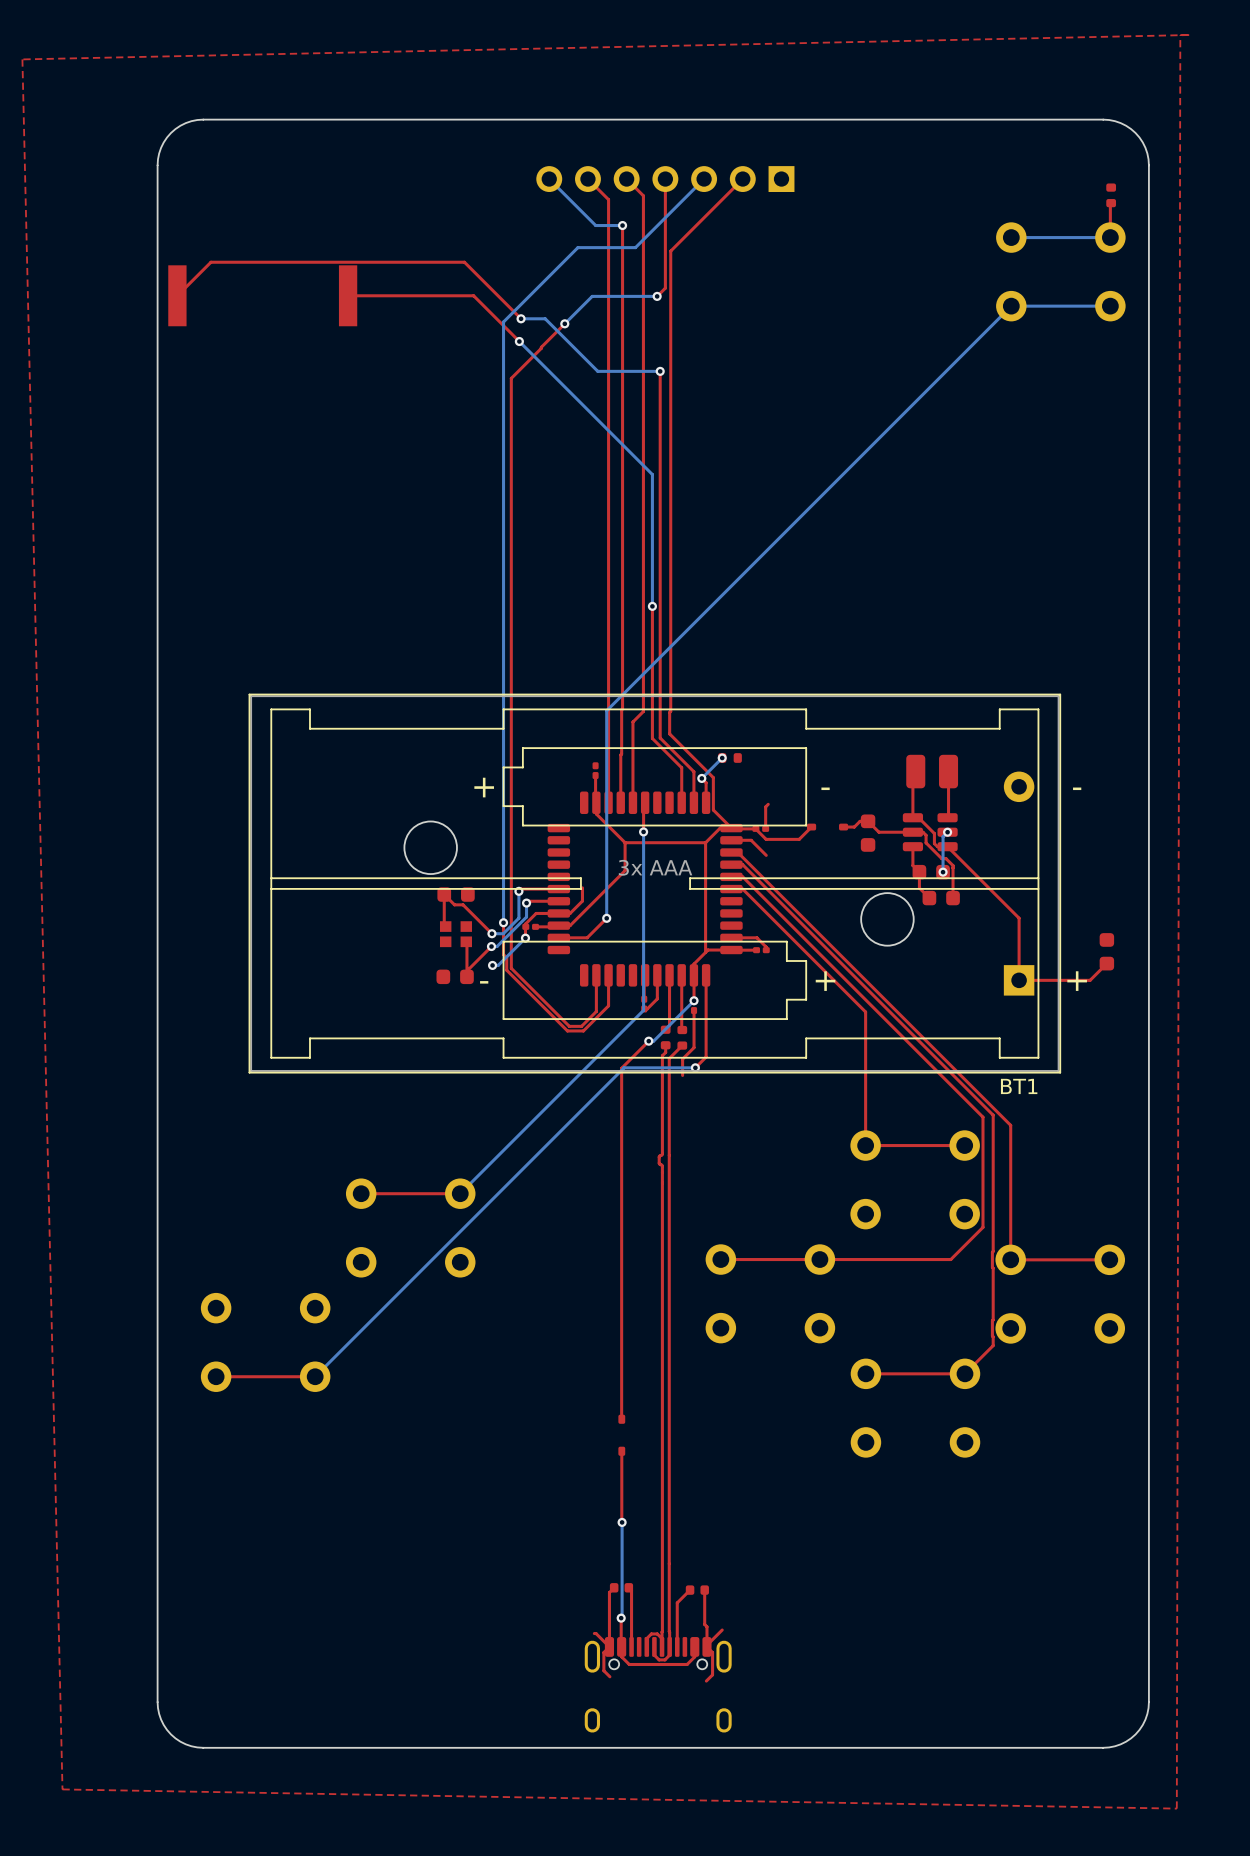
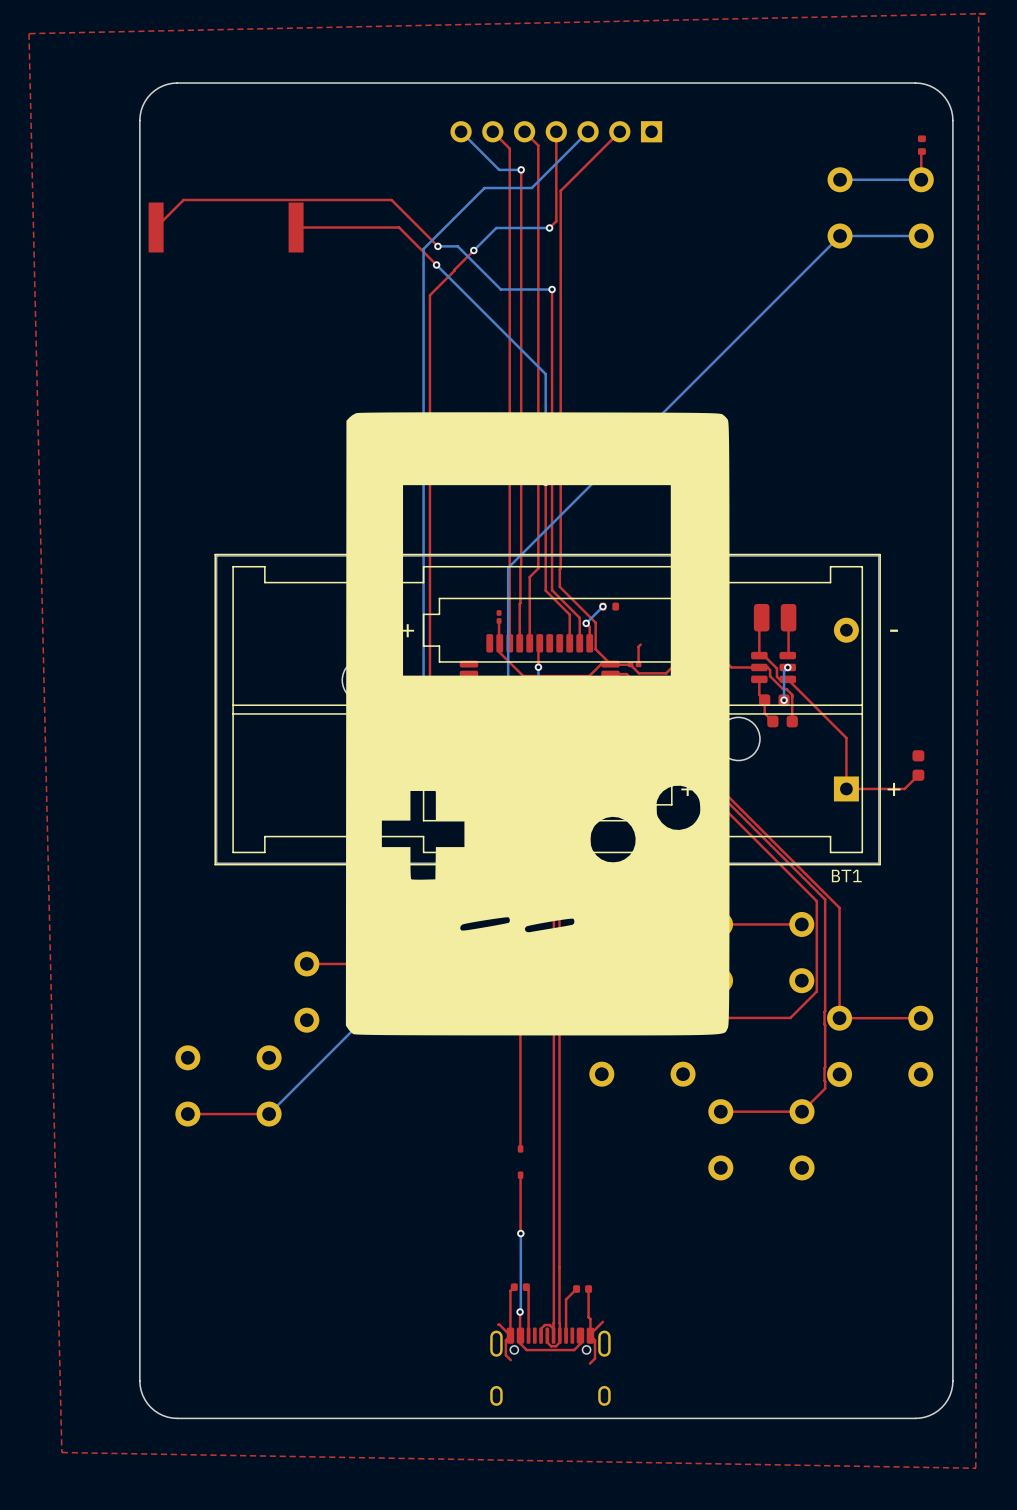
part: none -> (537, 723)

